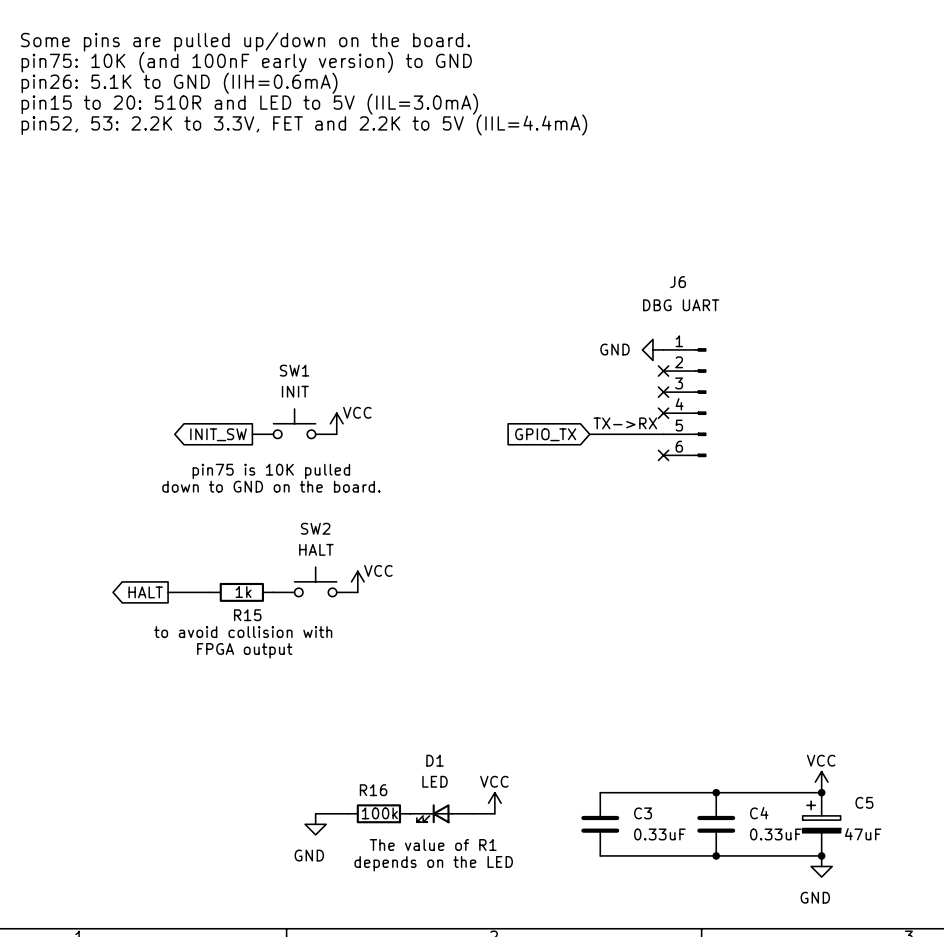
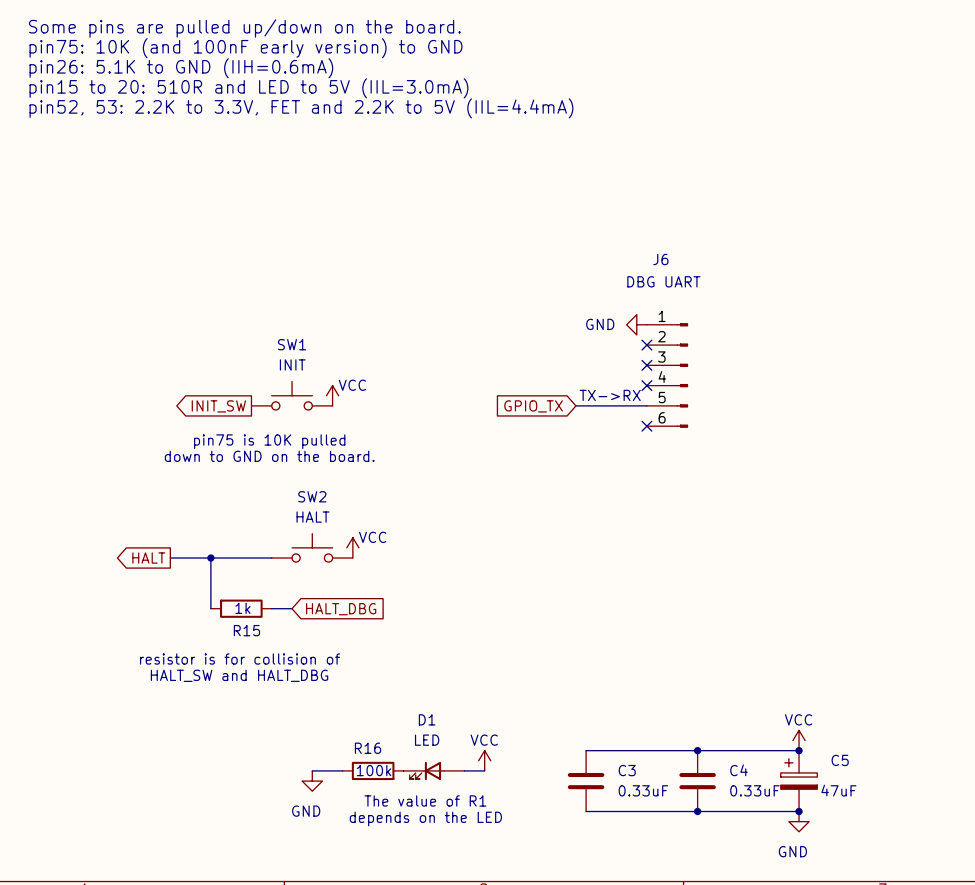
junction: none -> (210, 558)
R15 position: (241, 592) -> (241, 608)
wire: none -> (271, 558) (210, 558) (210, 608)
text: to avoid collision with (243, 632) -> none
wire: none -> (271, 608) (292, 608)
global label: none -> HALT_DBG (341, 609)
text: FPGA output (244, 650) -> none
text: none -> resistor is for collision of (240, 659)
text: none -> HALT_SW and HALT_DBG (239, 675)

